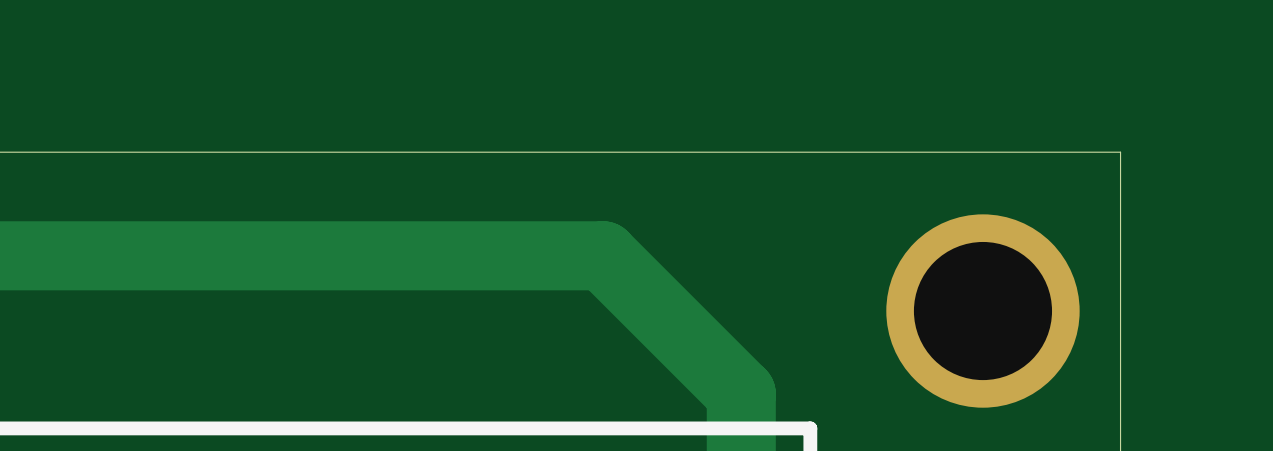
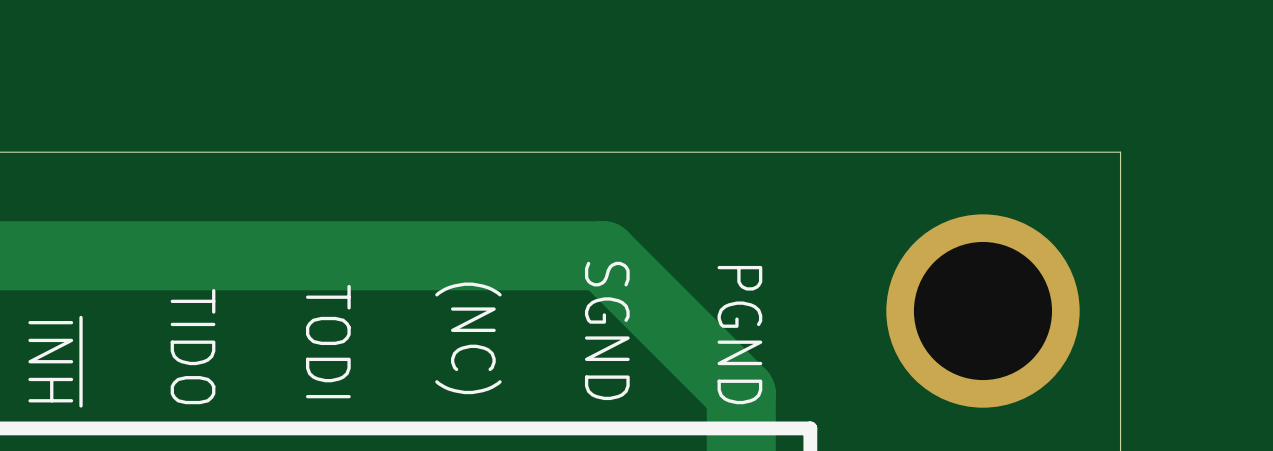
text: none -> SGND (607, 330)
text: none -> PGND (739, 335)
text: none -> (NC) (468, 338)
text: none -> TODI (328, 341)
text: none -> TIDO (193, 346)
text: none -> ~{INH} (55, 361)

